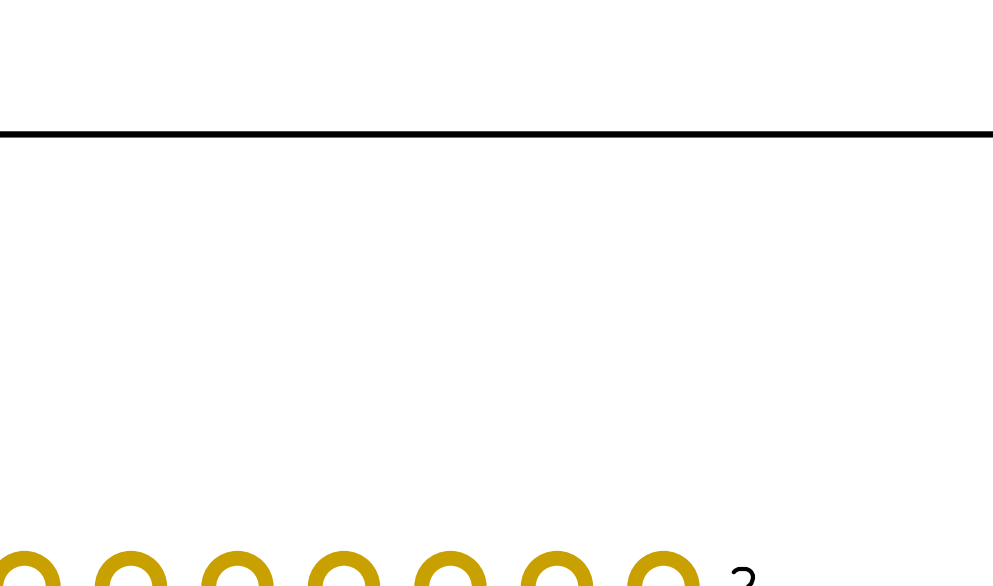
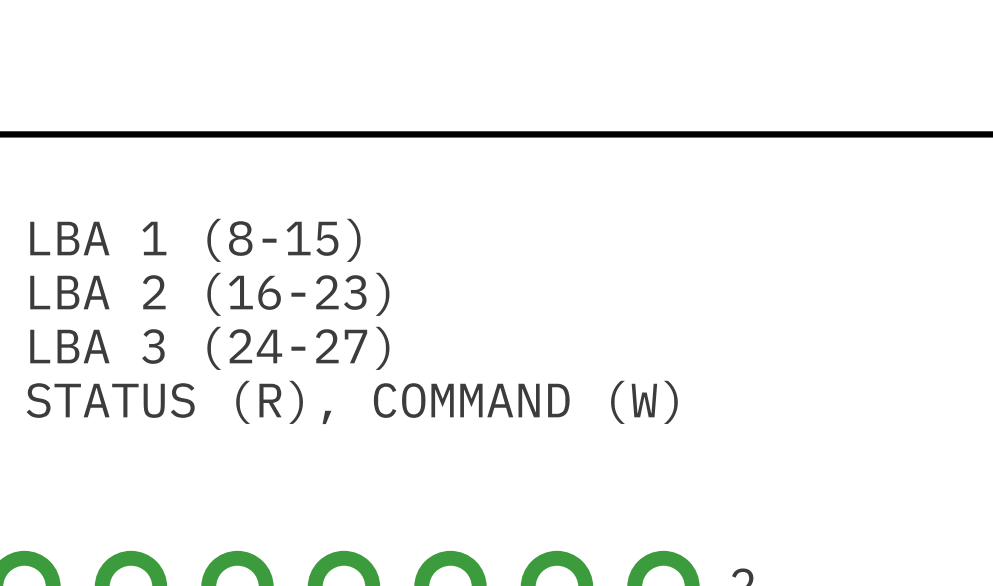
text: none -> LBA 1 (8-15) (195, 240)
text: none -> LBA 2 (16-23) (209, 294)
text: none -> LBA 3 (24-27) (209, 348)
text: none -> STATUS (R), COMMAND (W) (352, 402)

